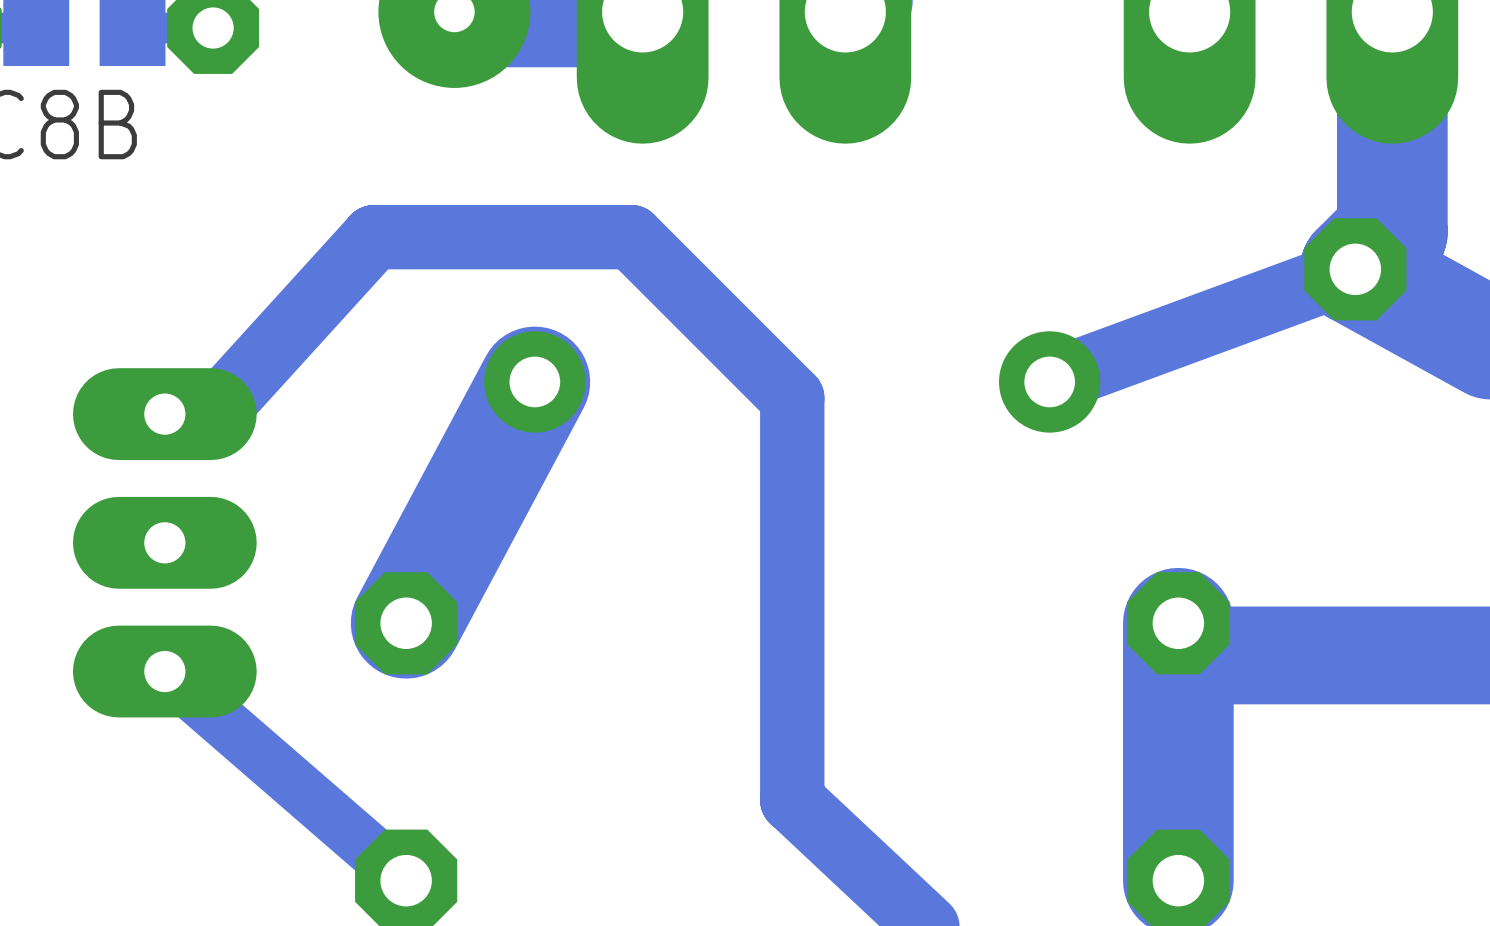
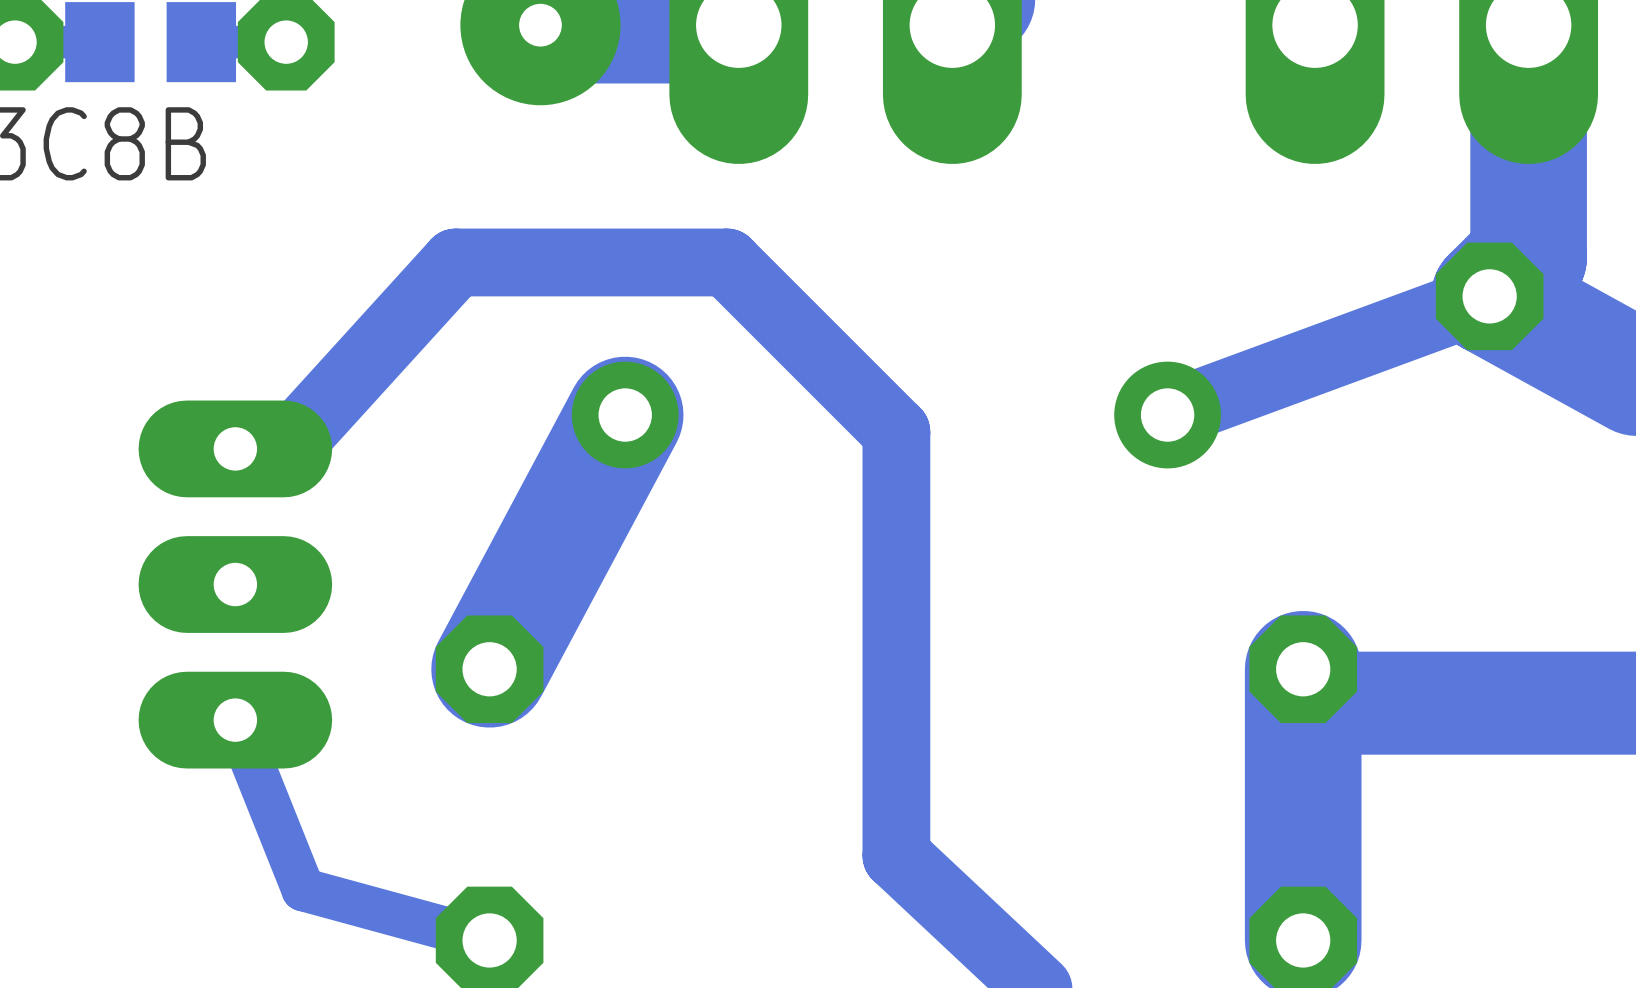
track: (164, 671) (406, 880) -> (235, 720) (303, 889) (489, 940)

